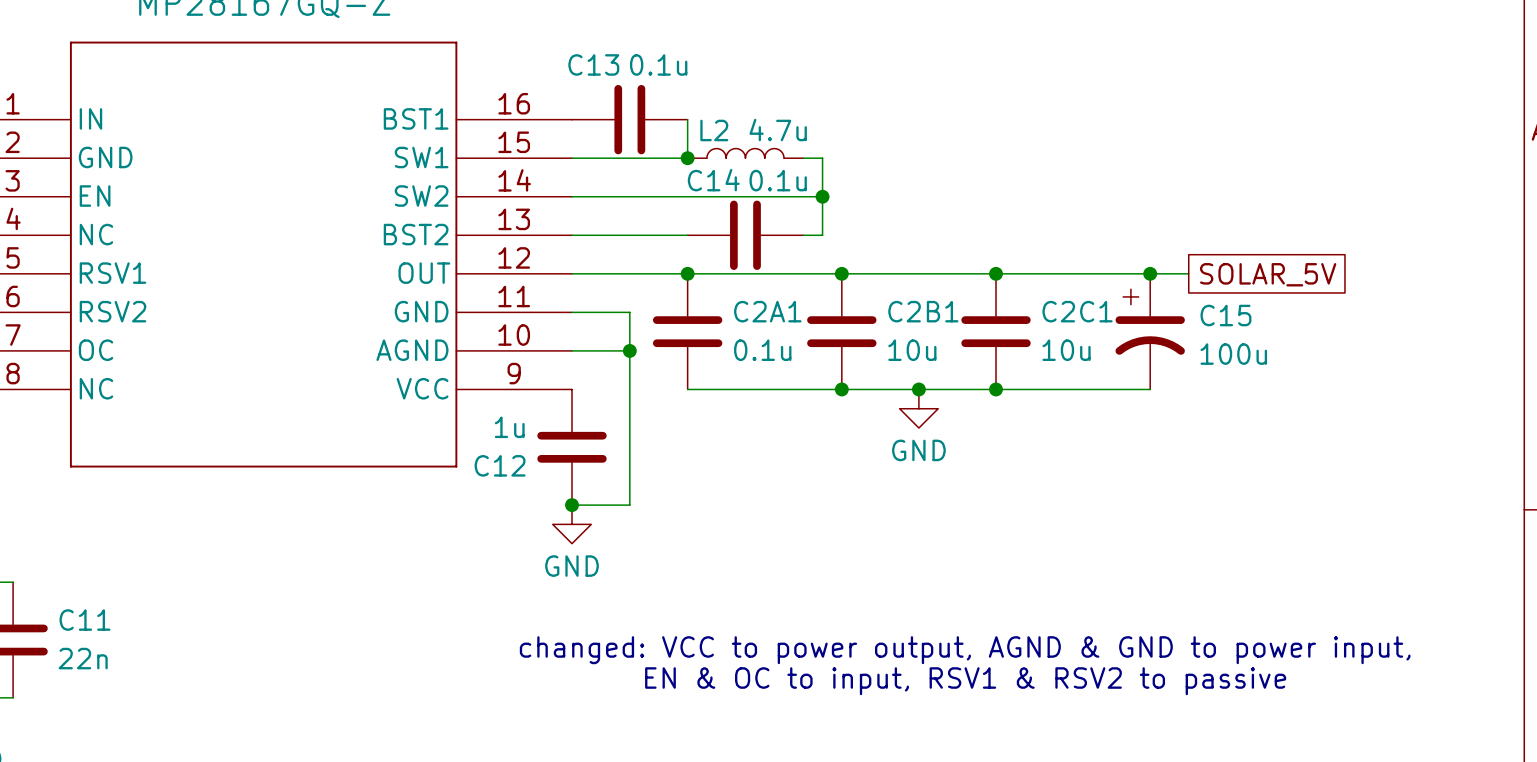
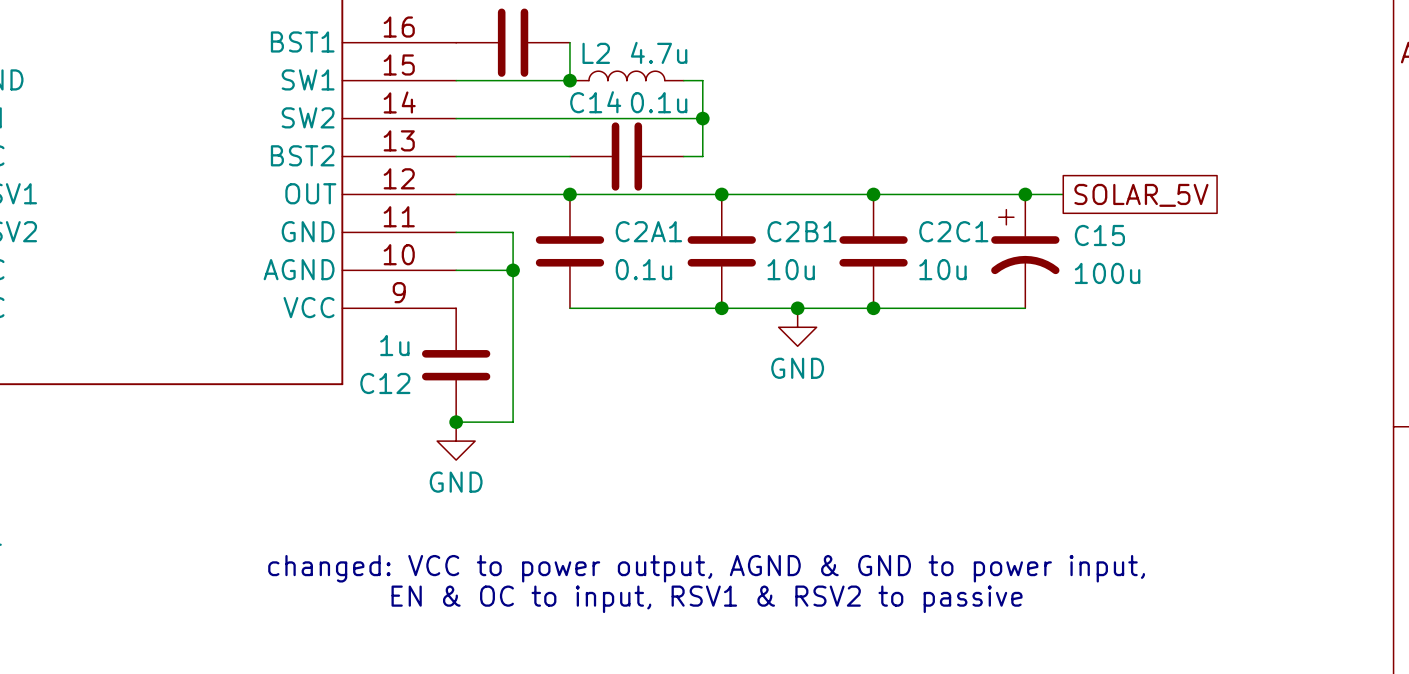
text position: changed: VCC to power output, AGND & GND to power input, (965, 650) -> changed: VCC to power output, AGND & GND to power input, (706, 568)
text position: EN & OC to input, RSV1 & RSV2 to passive (965, 681) -> EN & OC to input, RSV1 & RSV2 to passive (707, 599)

